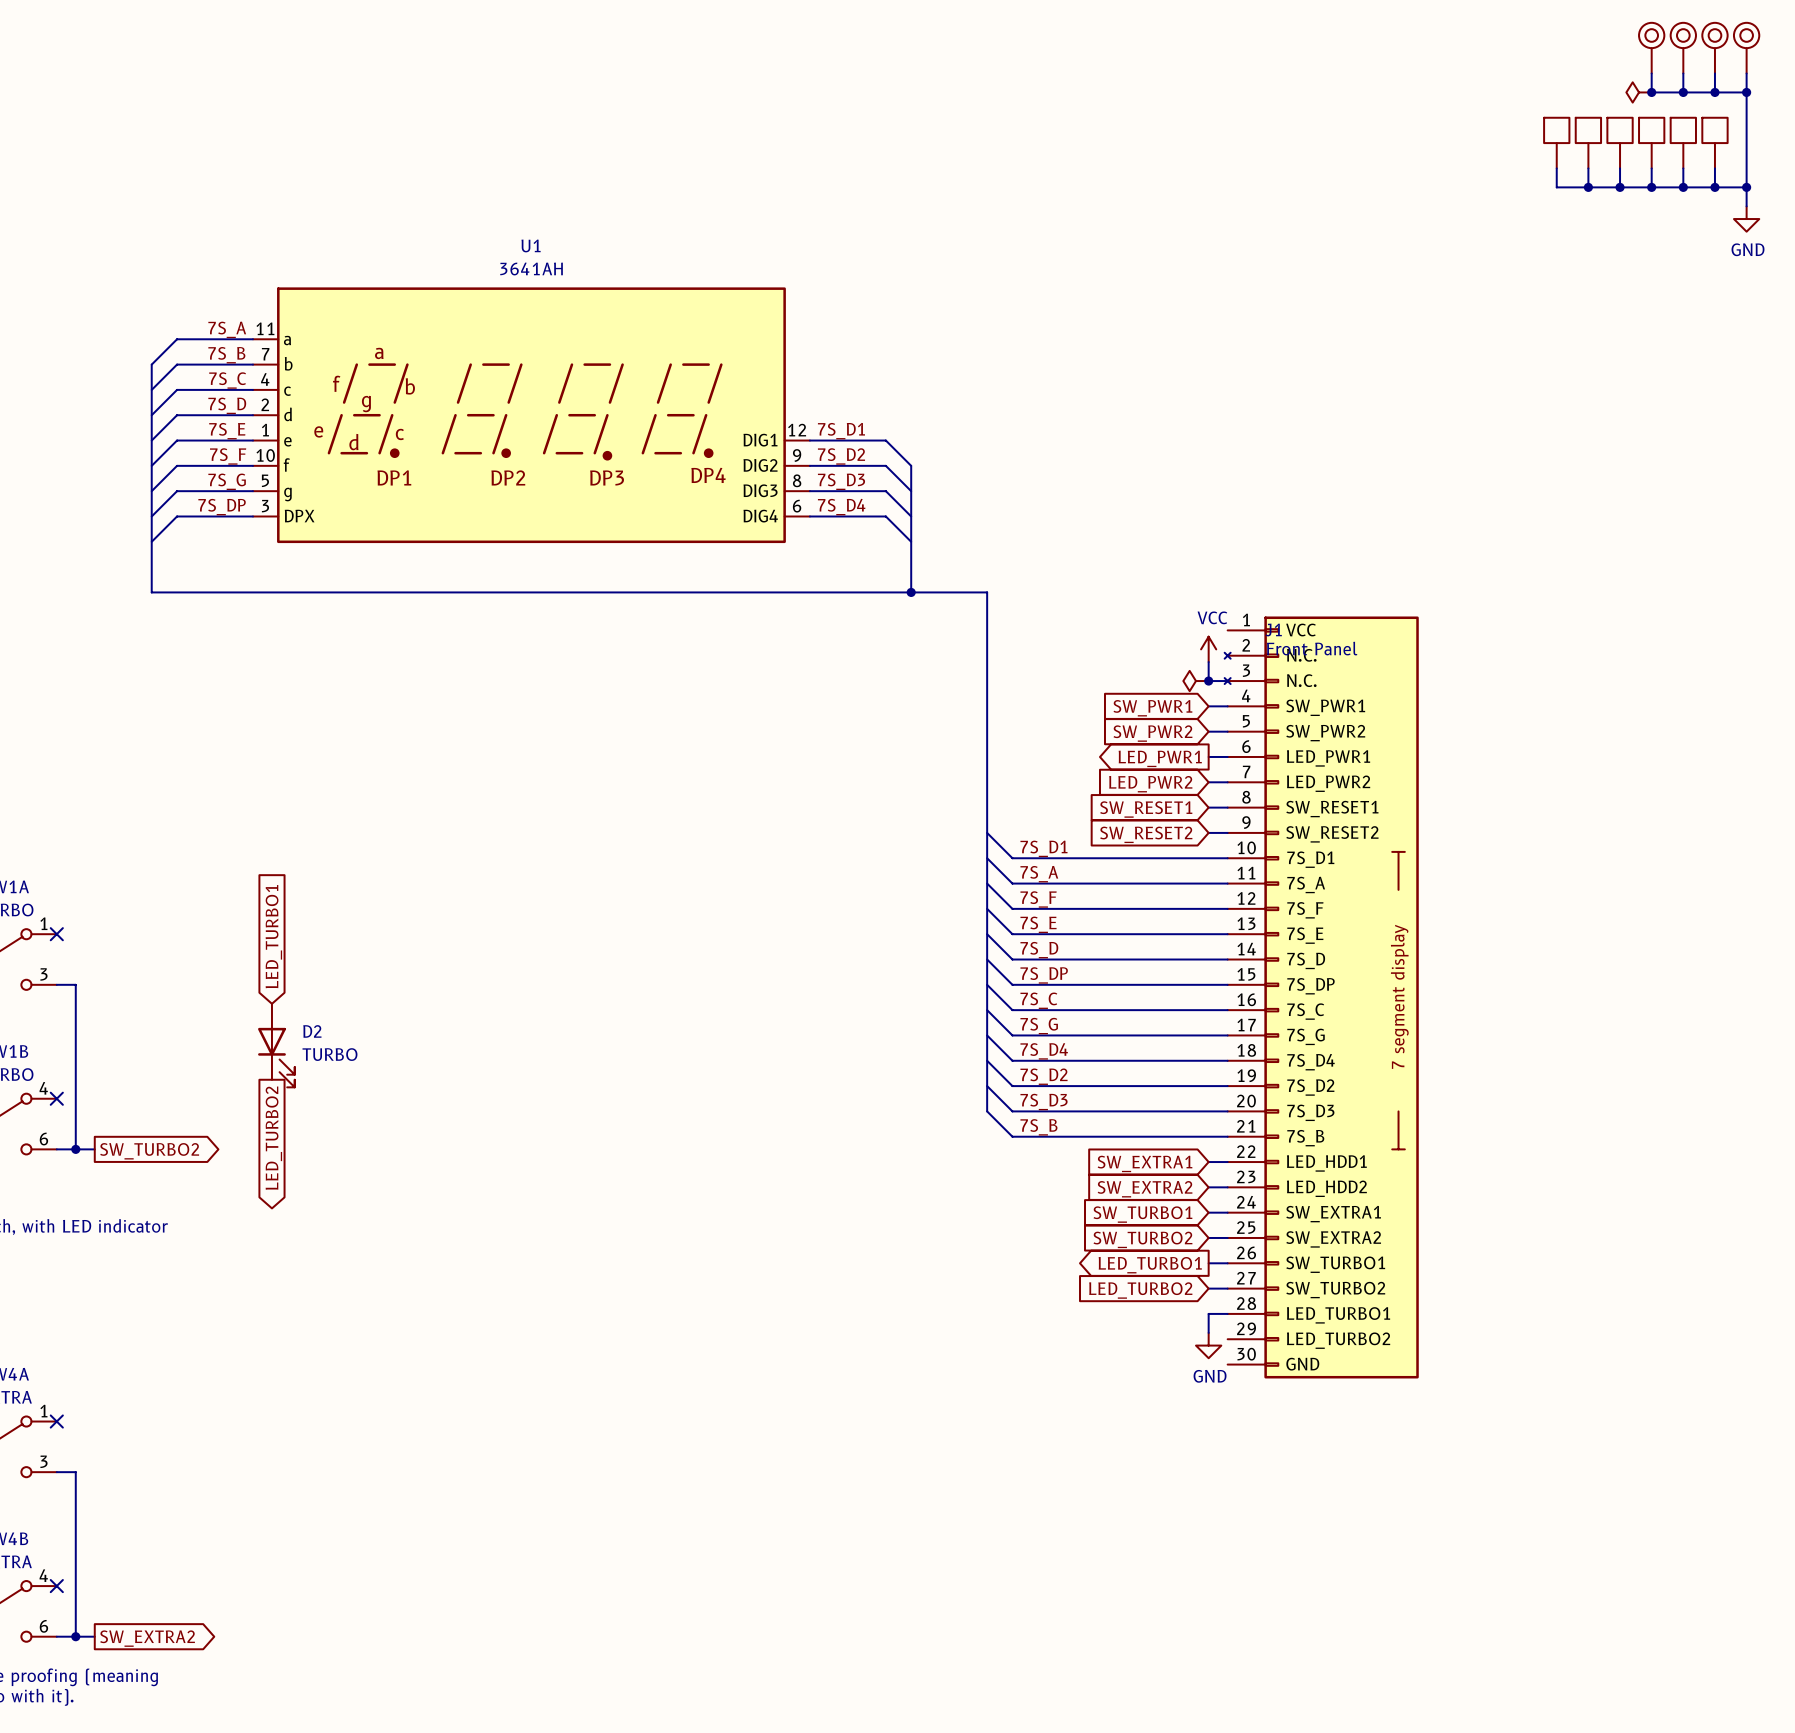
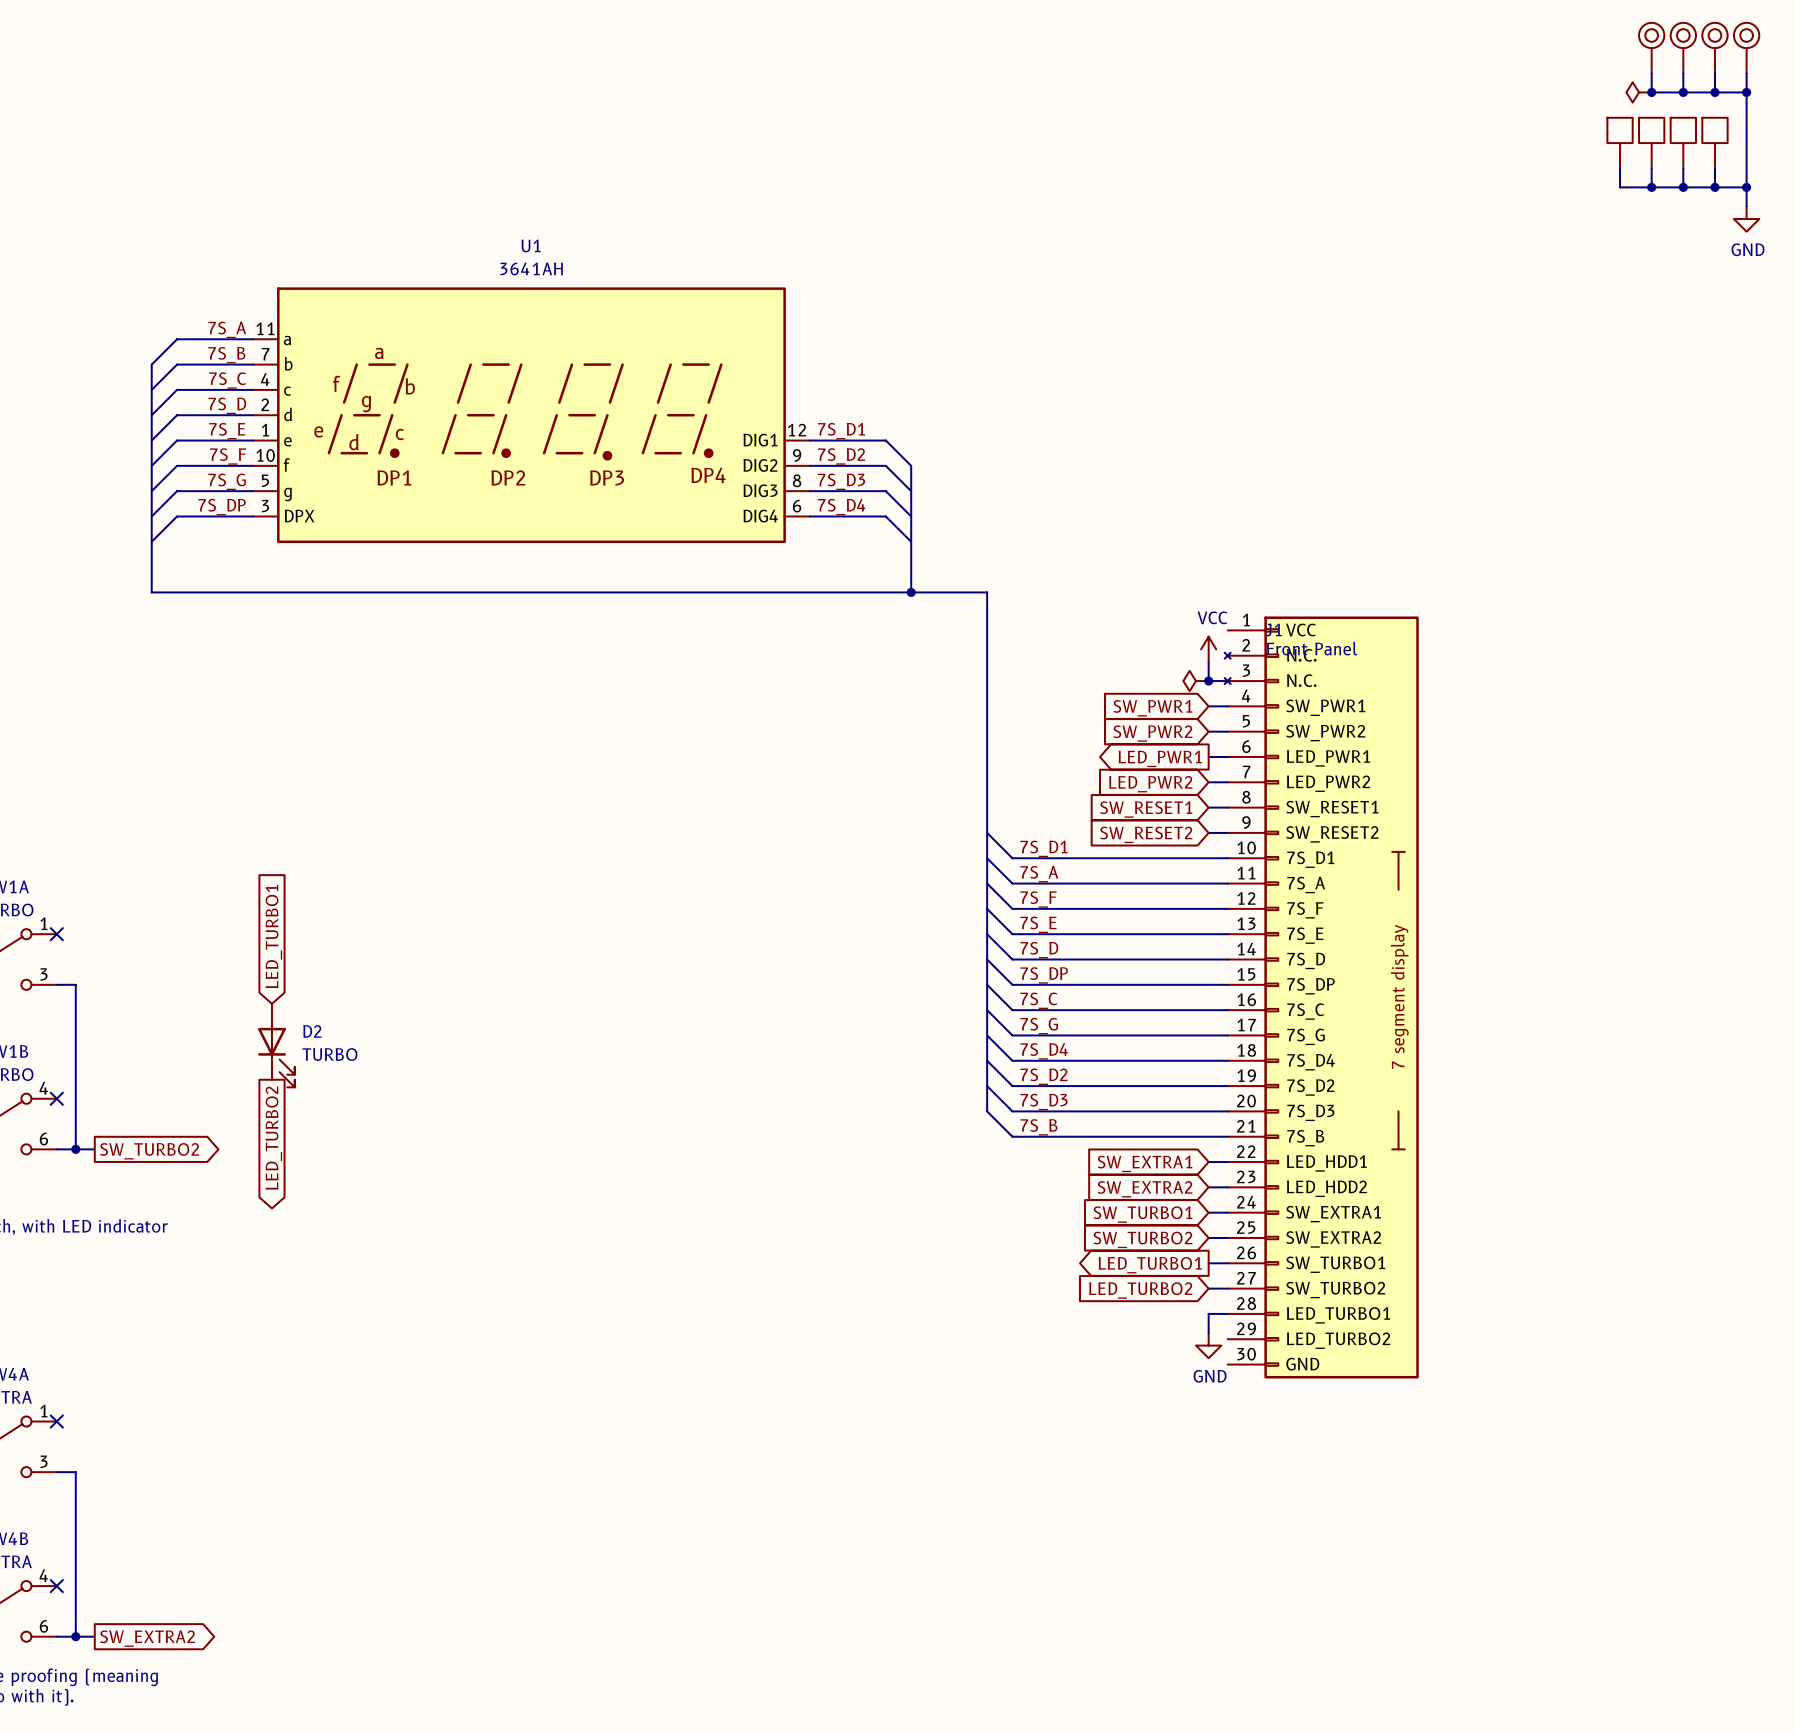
part: (1556, 143) -> none
part: (1588, 143) -> none
wire: (1556, 168) (1556, 187) (1620, 187) -> none
wire: (1588, 168) (1588, 187) -> none
junction: (1588, 187) -> none
junction: (1620, 187) -> none

